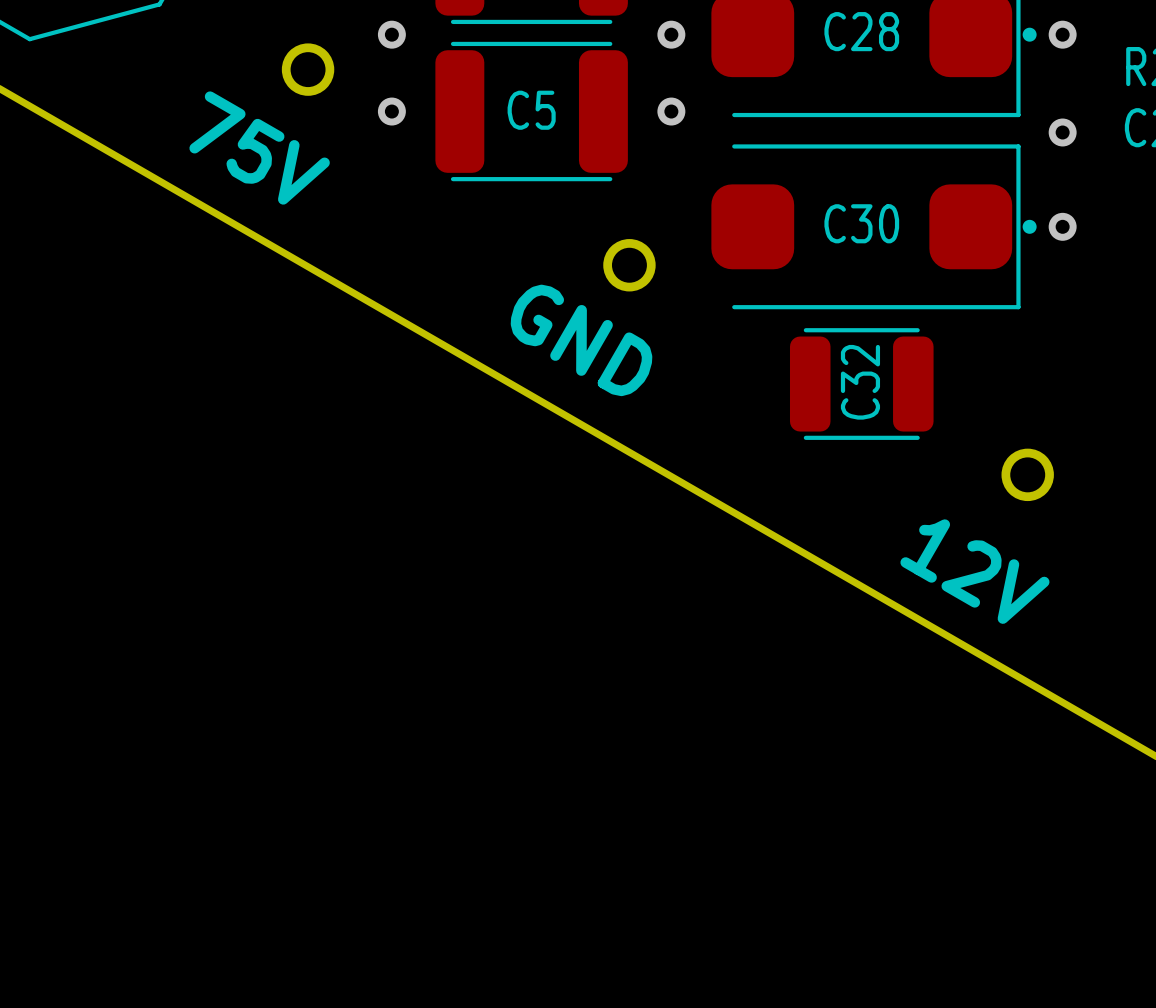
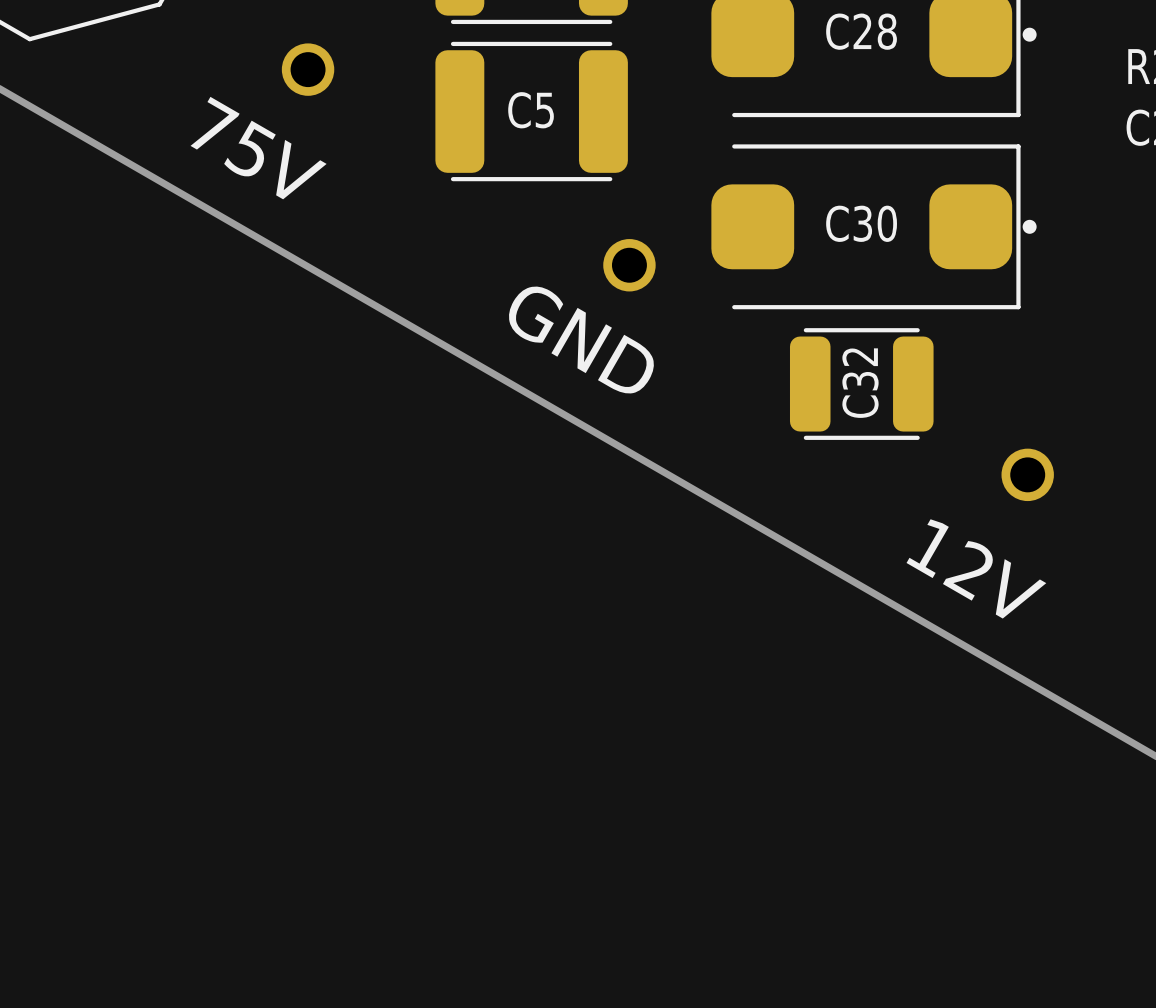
via: (391, 34) -> none
via: (671, 34) -> none
via: (1062, 34) -> none
via: (391, 111) -> none
via: (671, 111) -> none
via: (1062, 132) -> none
via: (1062, 226) -> none

